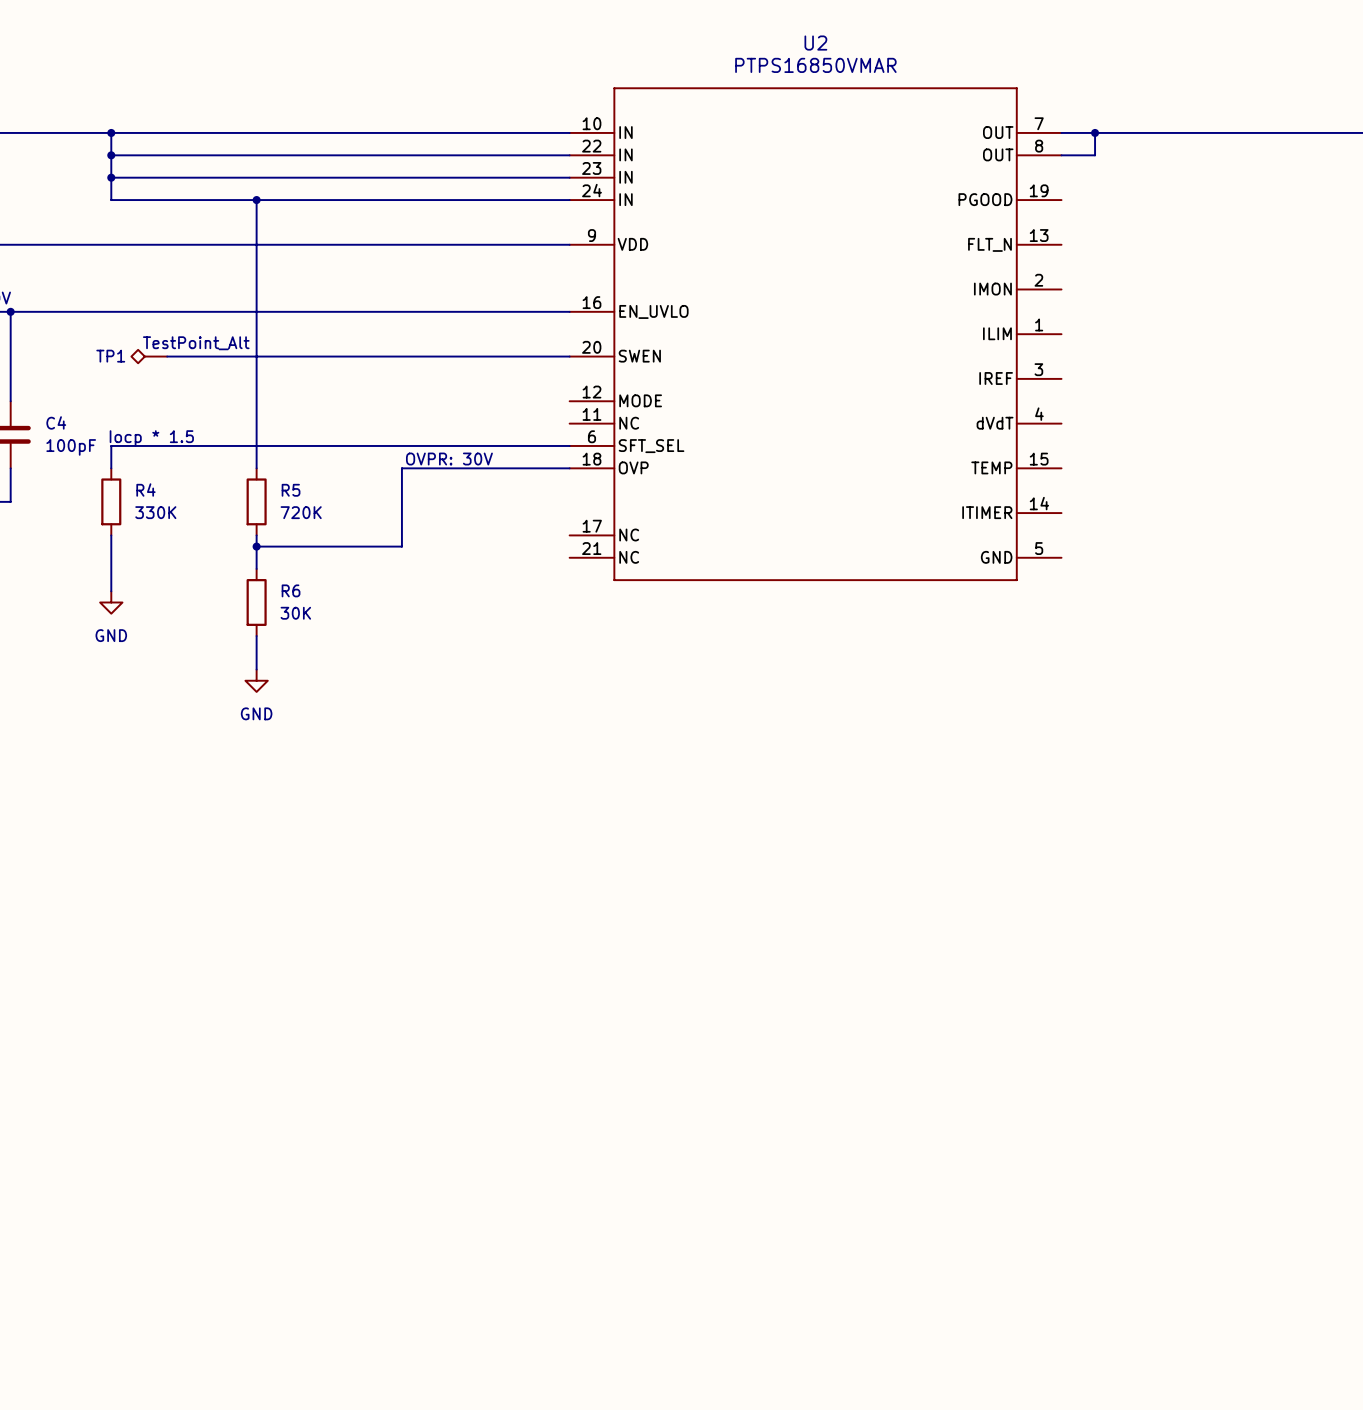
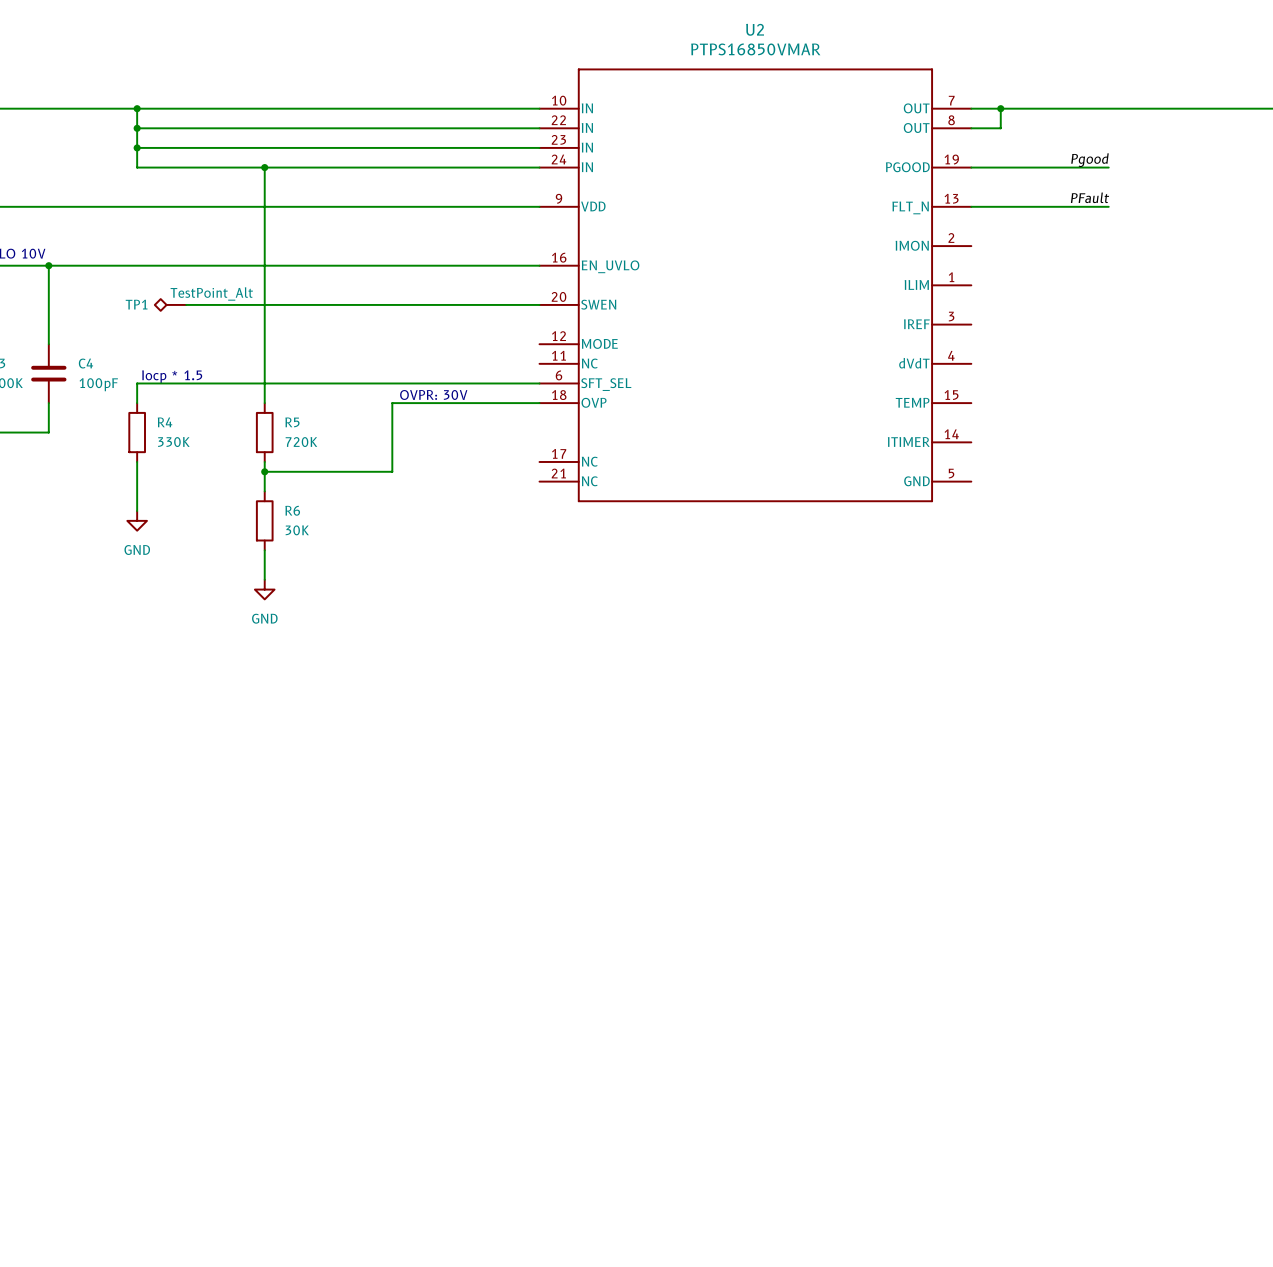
label: none -> Pgood (1089, 160)
wire: none -> (971, 167) (1108, 167)
label: none -> PFault (1090, 197)
wire: none -> (971, 206) (1108, 206)

